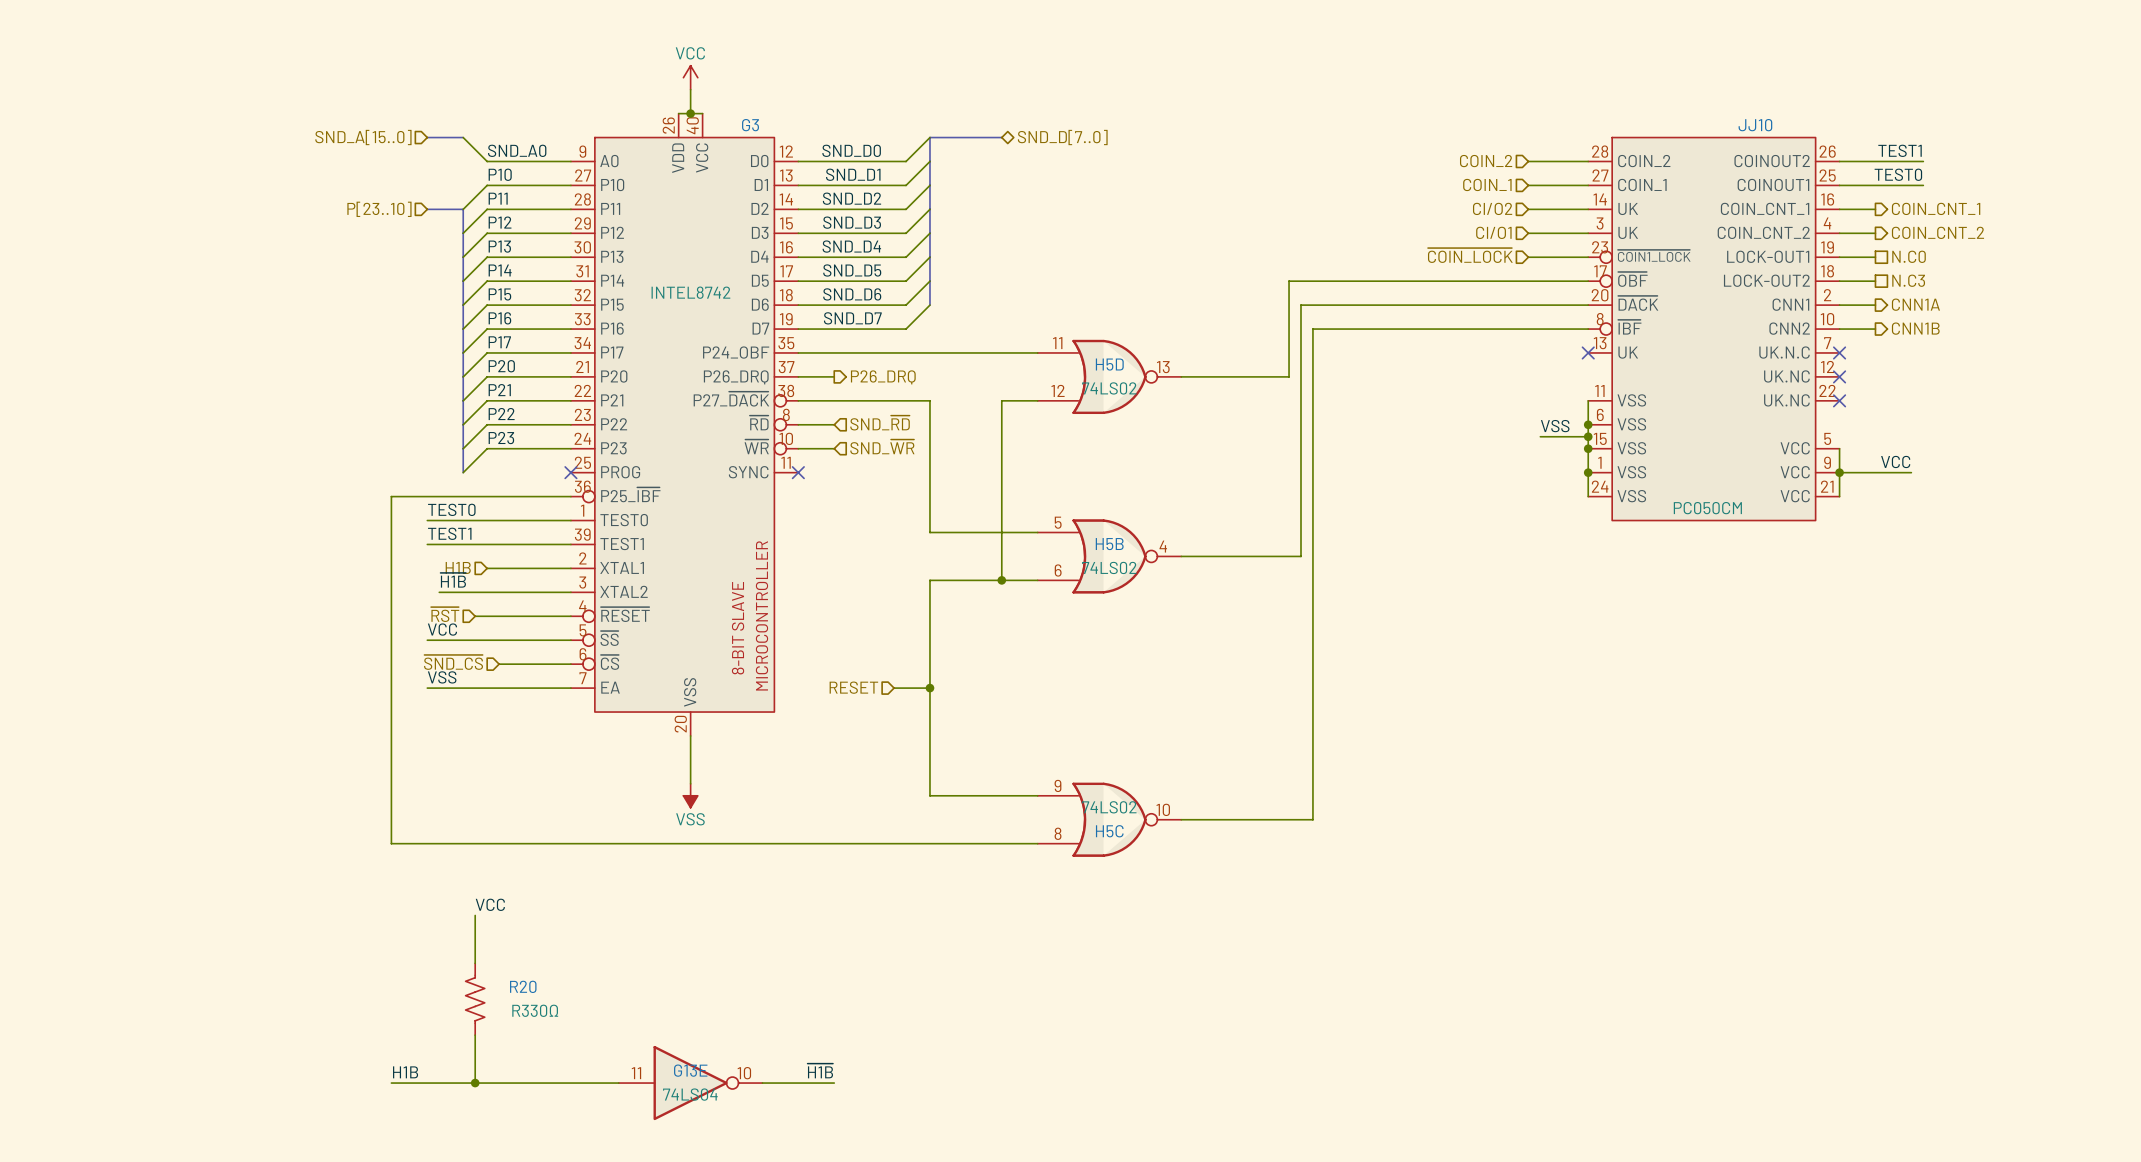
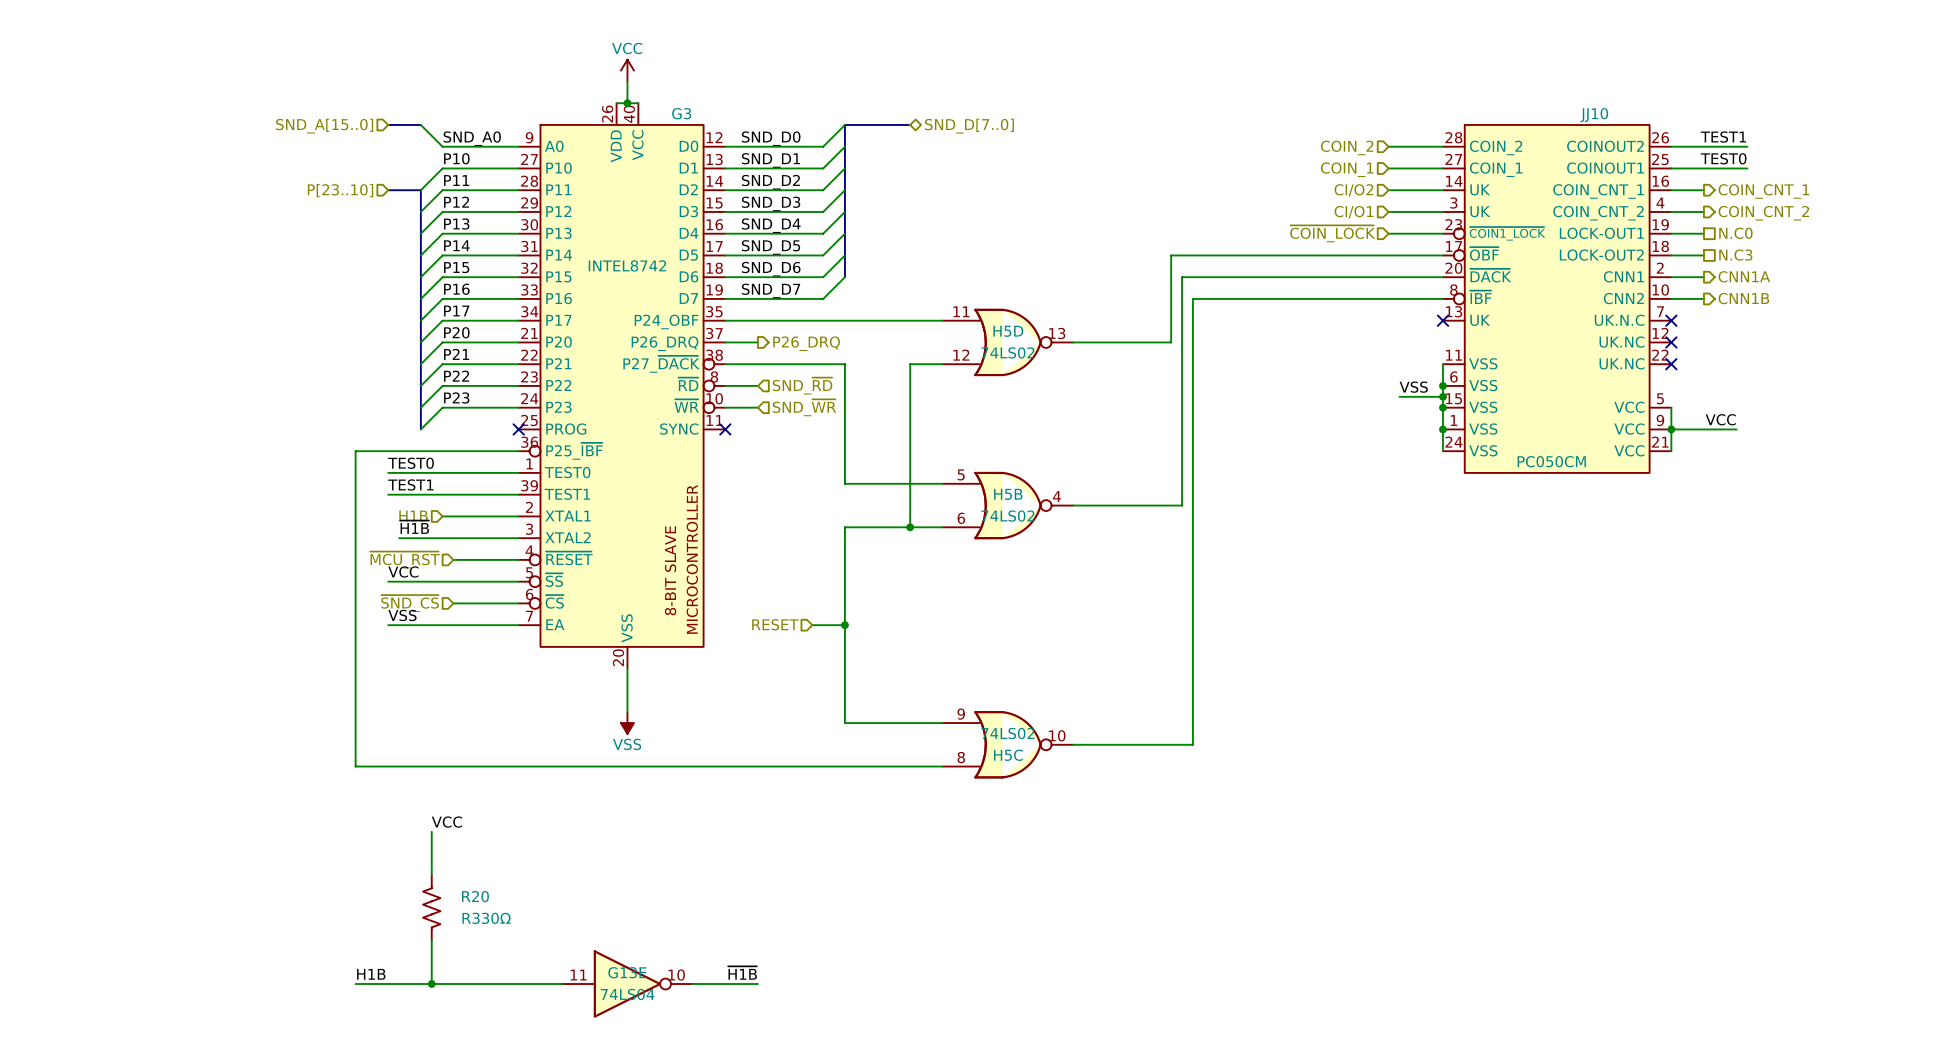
hierarchical label: ~{RST} (445, 614) -> ~{MCU_RST} (404, 560)
wire: (475, 616) (499, 616) -> none

